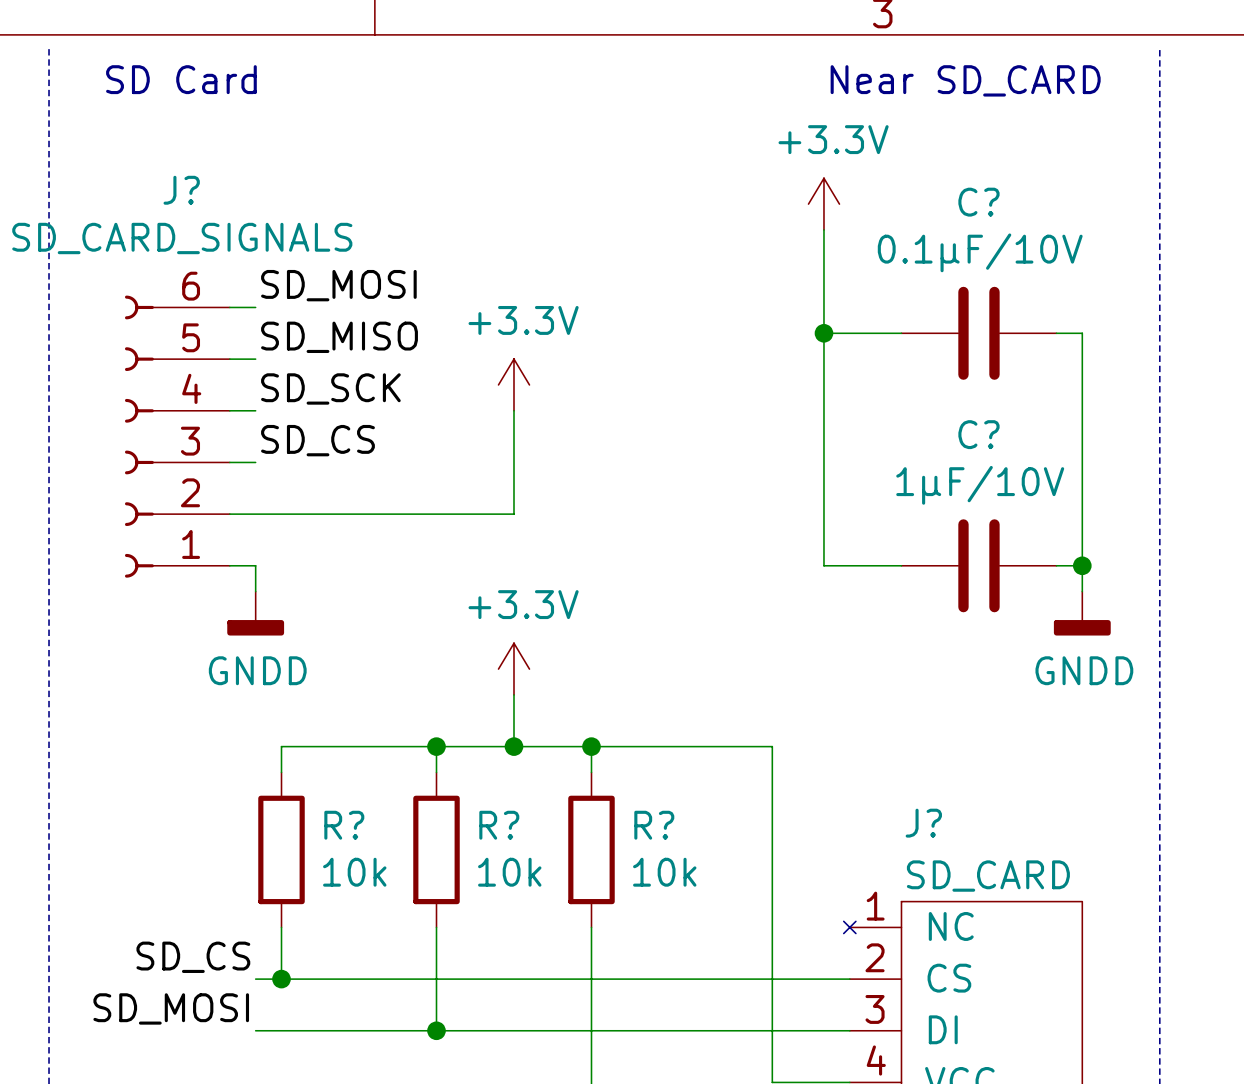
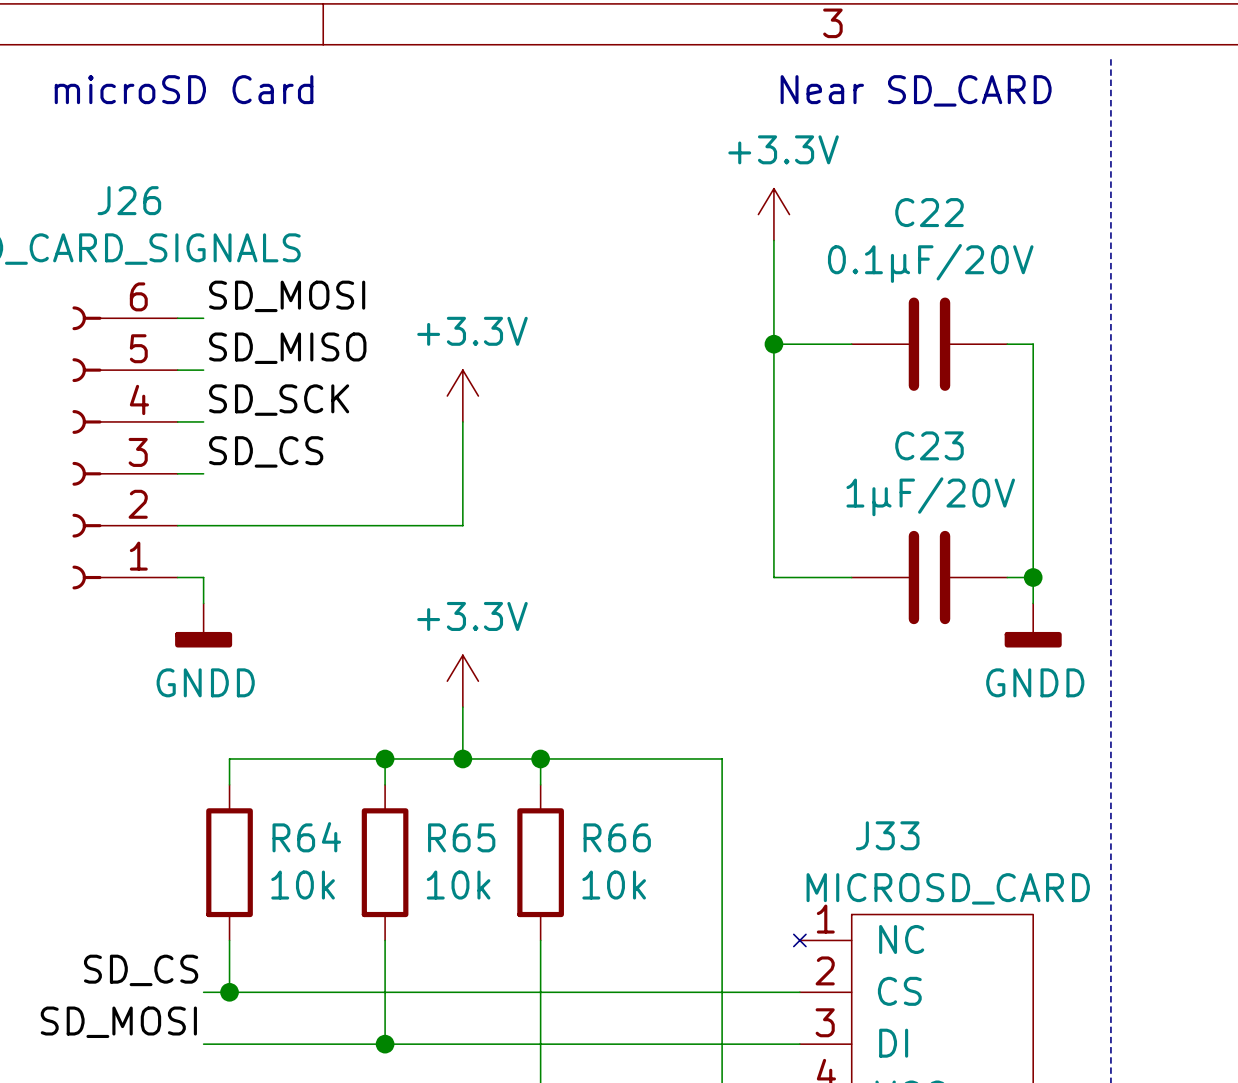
text: SD Card (181, 79) -> microSD Card (184, 89)
J? name: J? (181, 190) -> J26 (129, 200)
C? name: C? (978, 202) -> C22 (929, 212)
C? value: 0.1µF/10V (980, 252) -> 0.1µF/20V (930, 263)
C? name: C? (978, 434) -> C23 (929, 445)
C? value: 1µF/10V (980, 485) -> 1µF/20V (930, 496)
J? name: J? (923, 823) -> J33 (887, 835)
R? name: R? (344, 825) -> R64 (306, 837)
R? name: R? (499, 825) -> R65 (461, 837)
R? name: R? (654, 825) -> R66 (617, 837)
J? value: SD_CARD (988, 876) -> MICROSD_CARD (948, 888)

